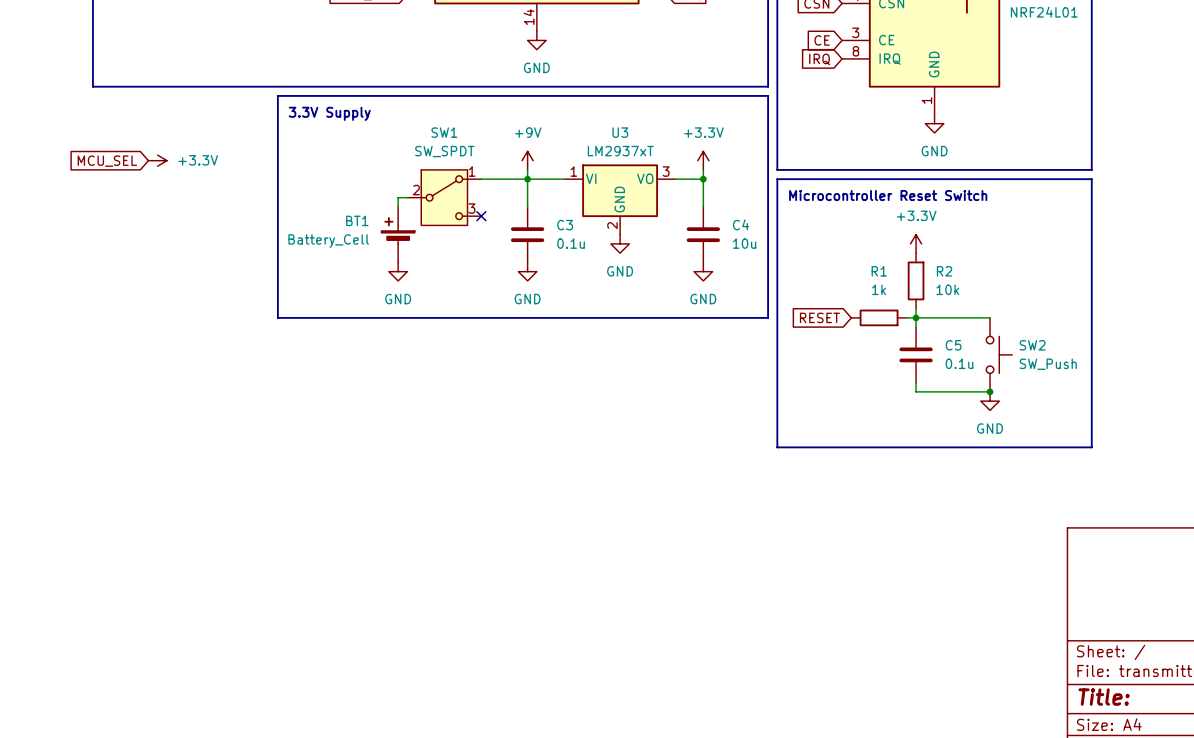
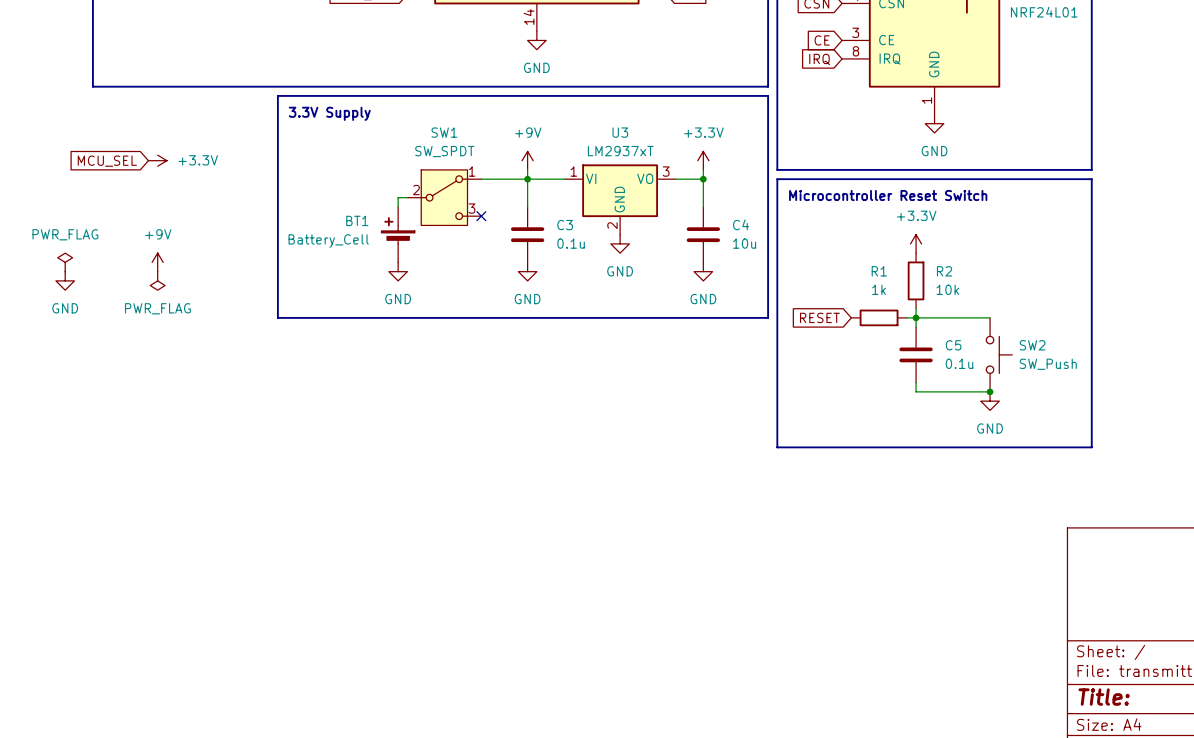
power symbol: none -> PWR_FLAG (65, 262)
power symbol: none -> +9V (157, 262)
power symbol: none -> GND (65, 280)
power symbol: none -> PWR_FLAG (157, 280)

